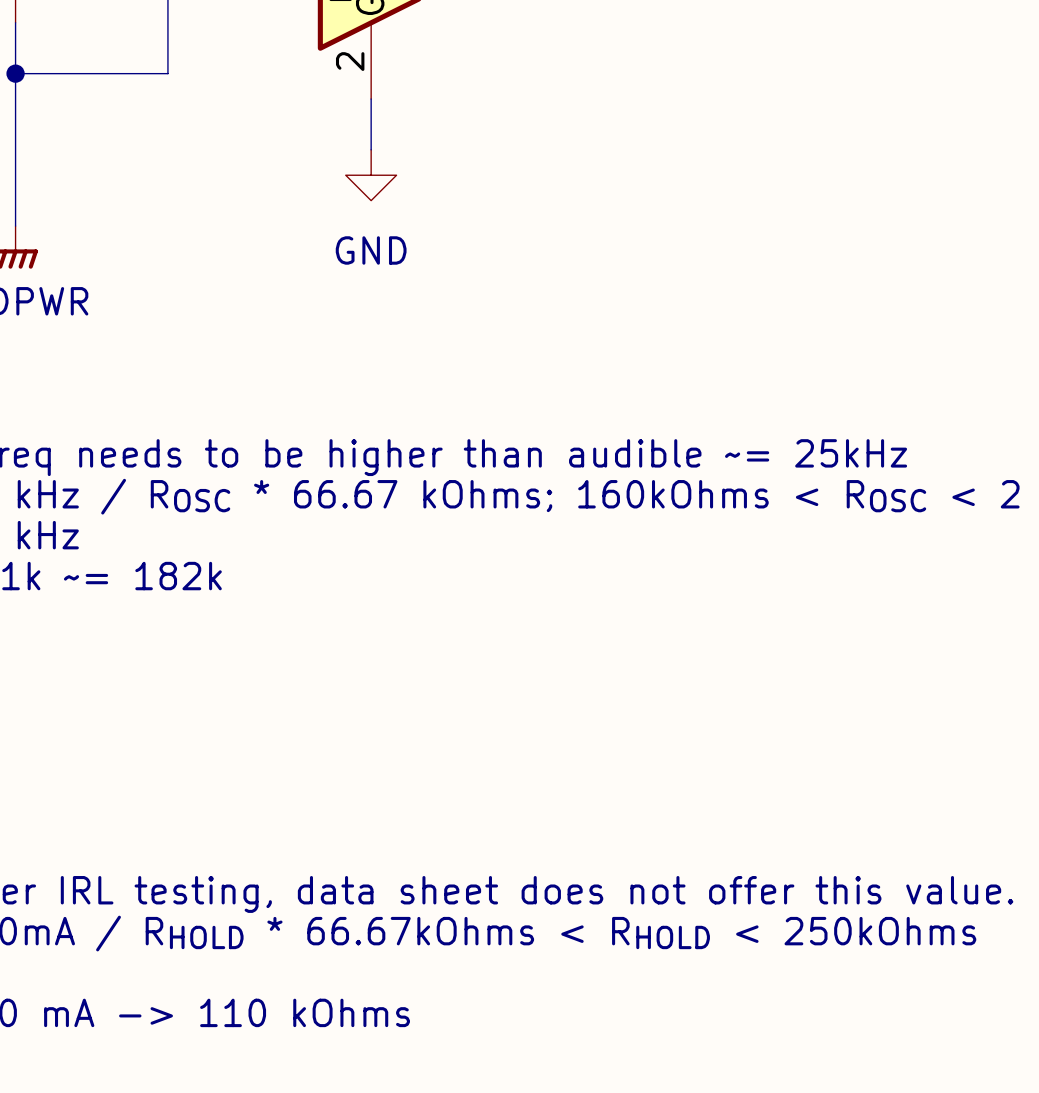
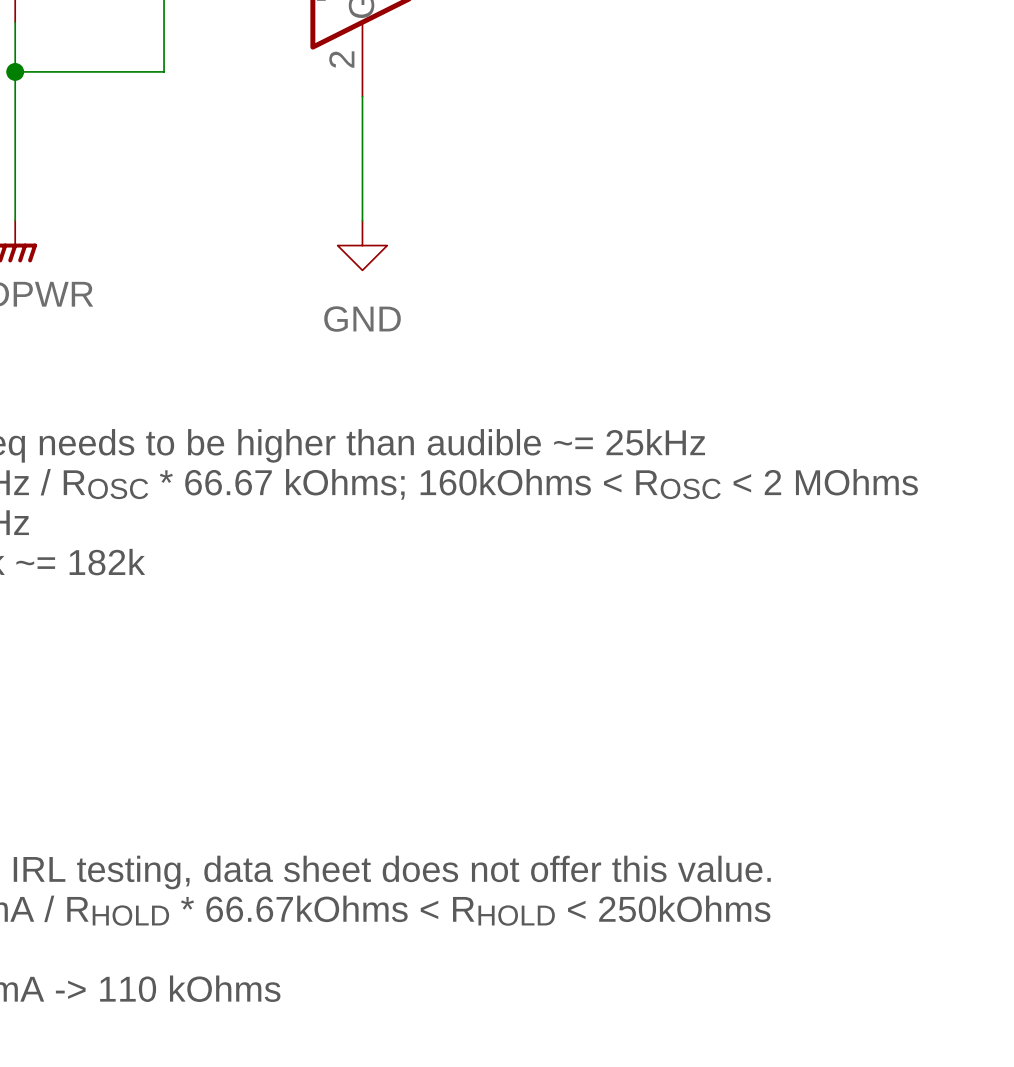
wire: none -> (362, 146) (362, 220)
power symbol position: GND (371, 175) -> GND (362, 245)

